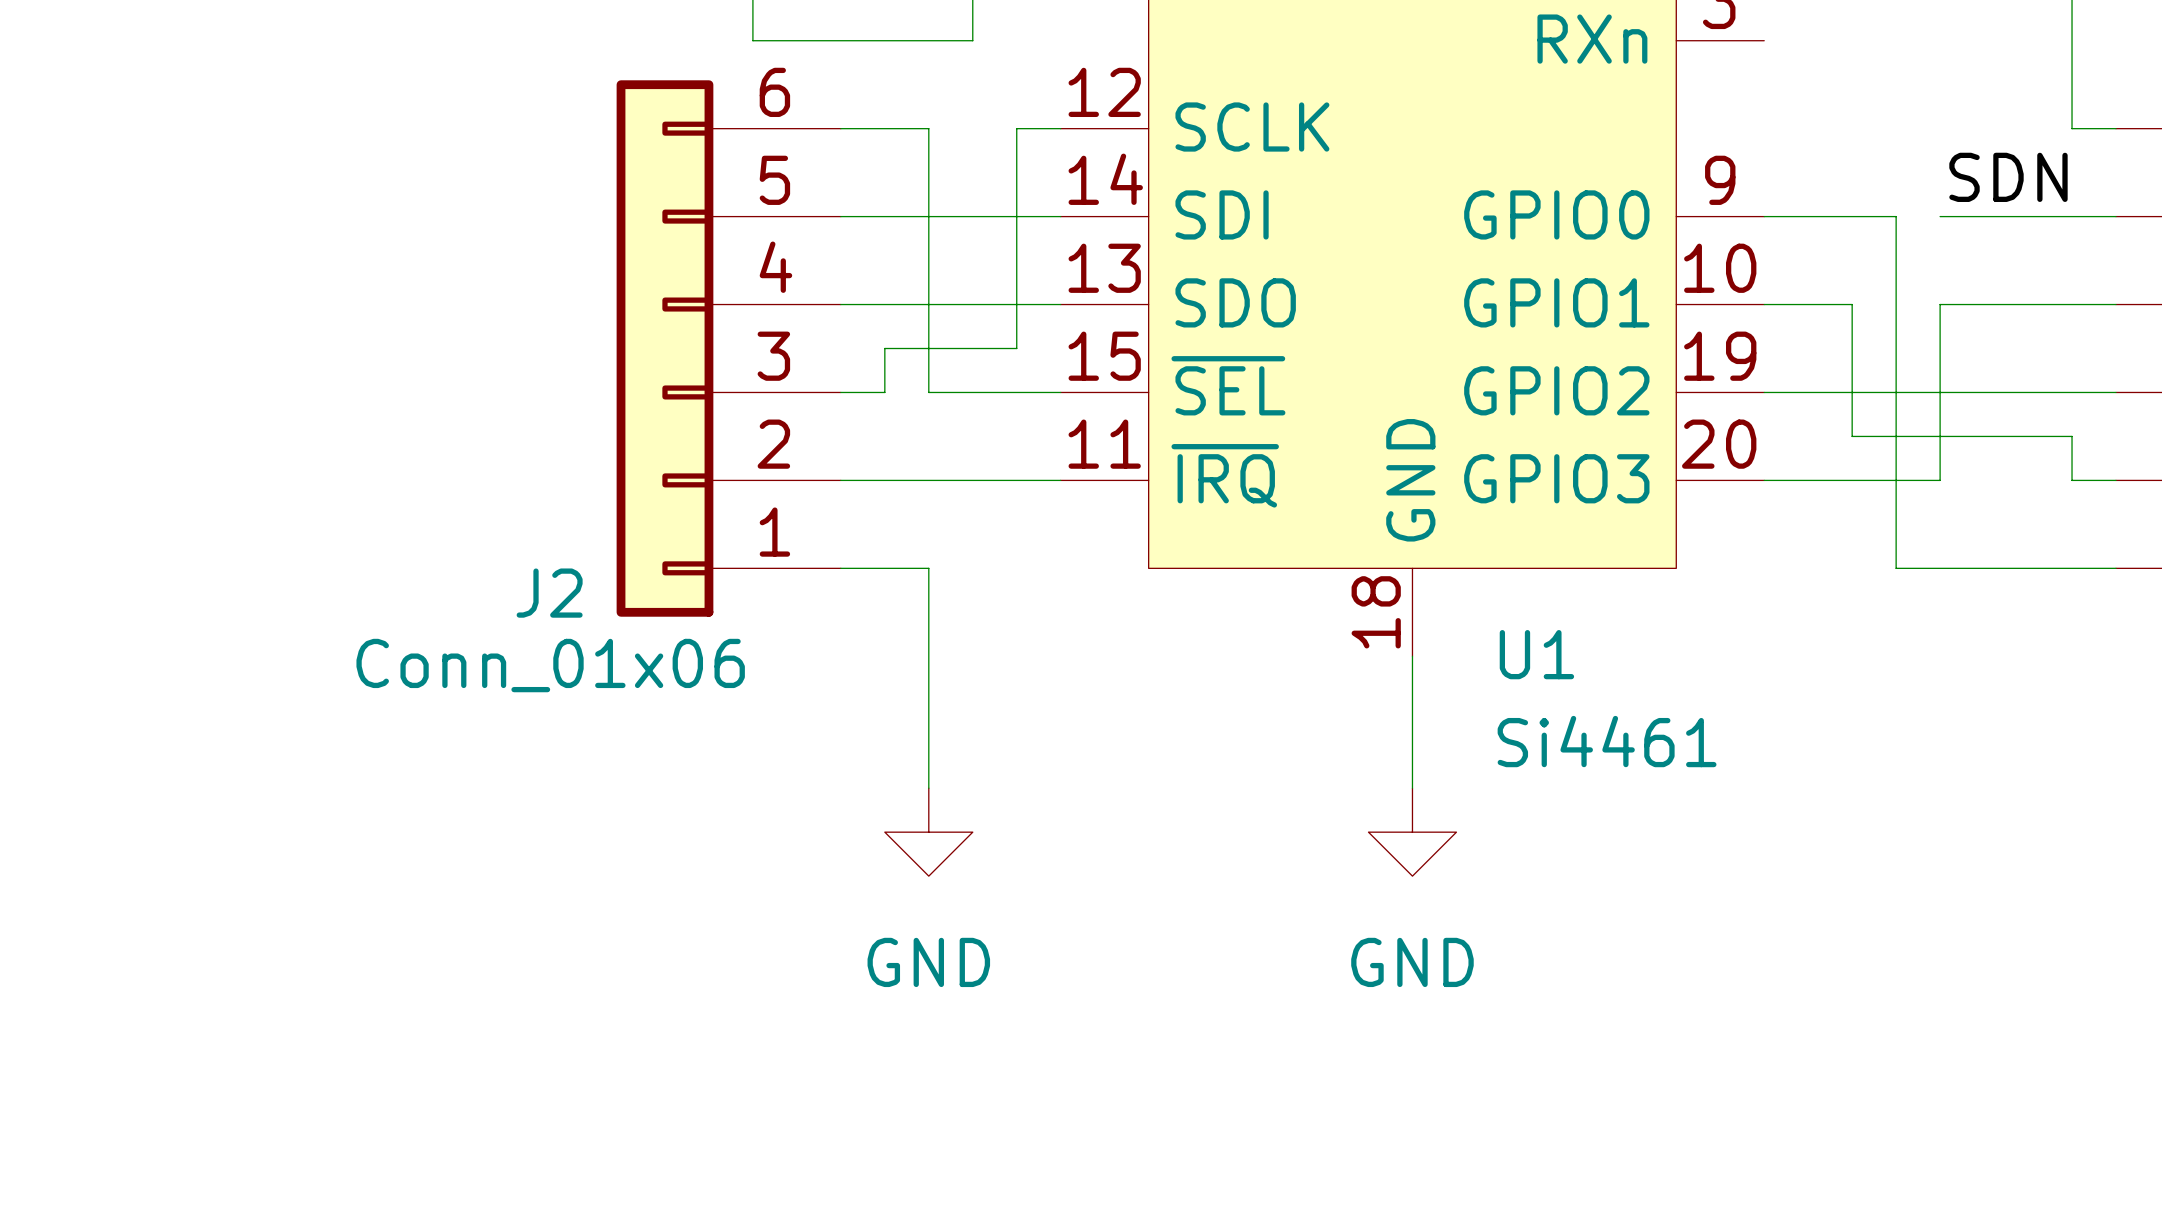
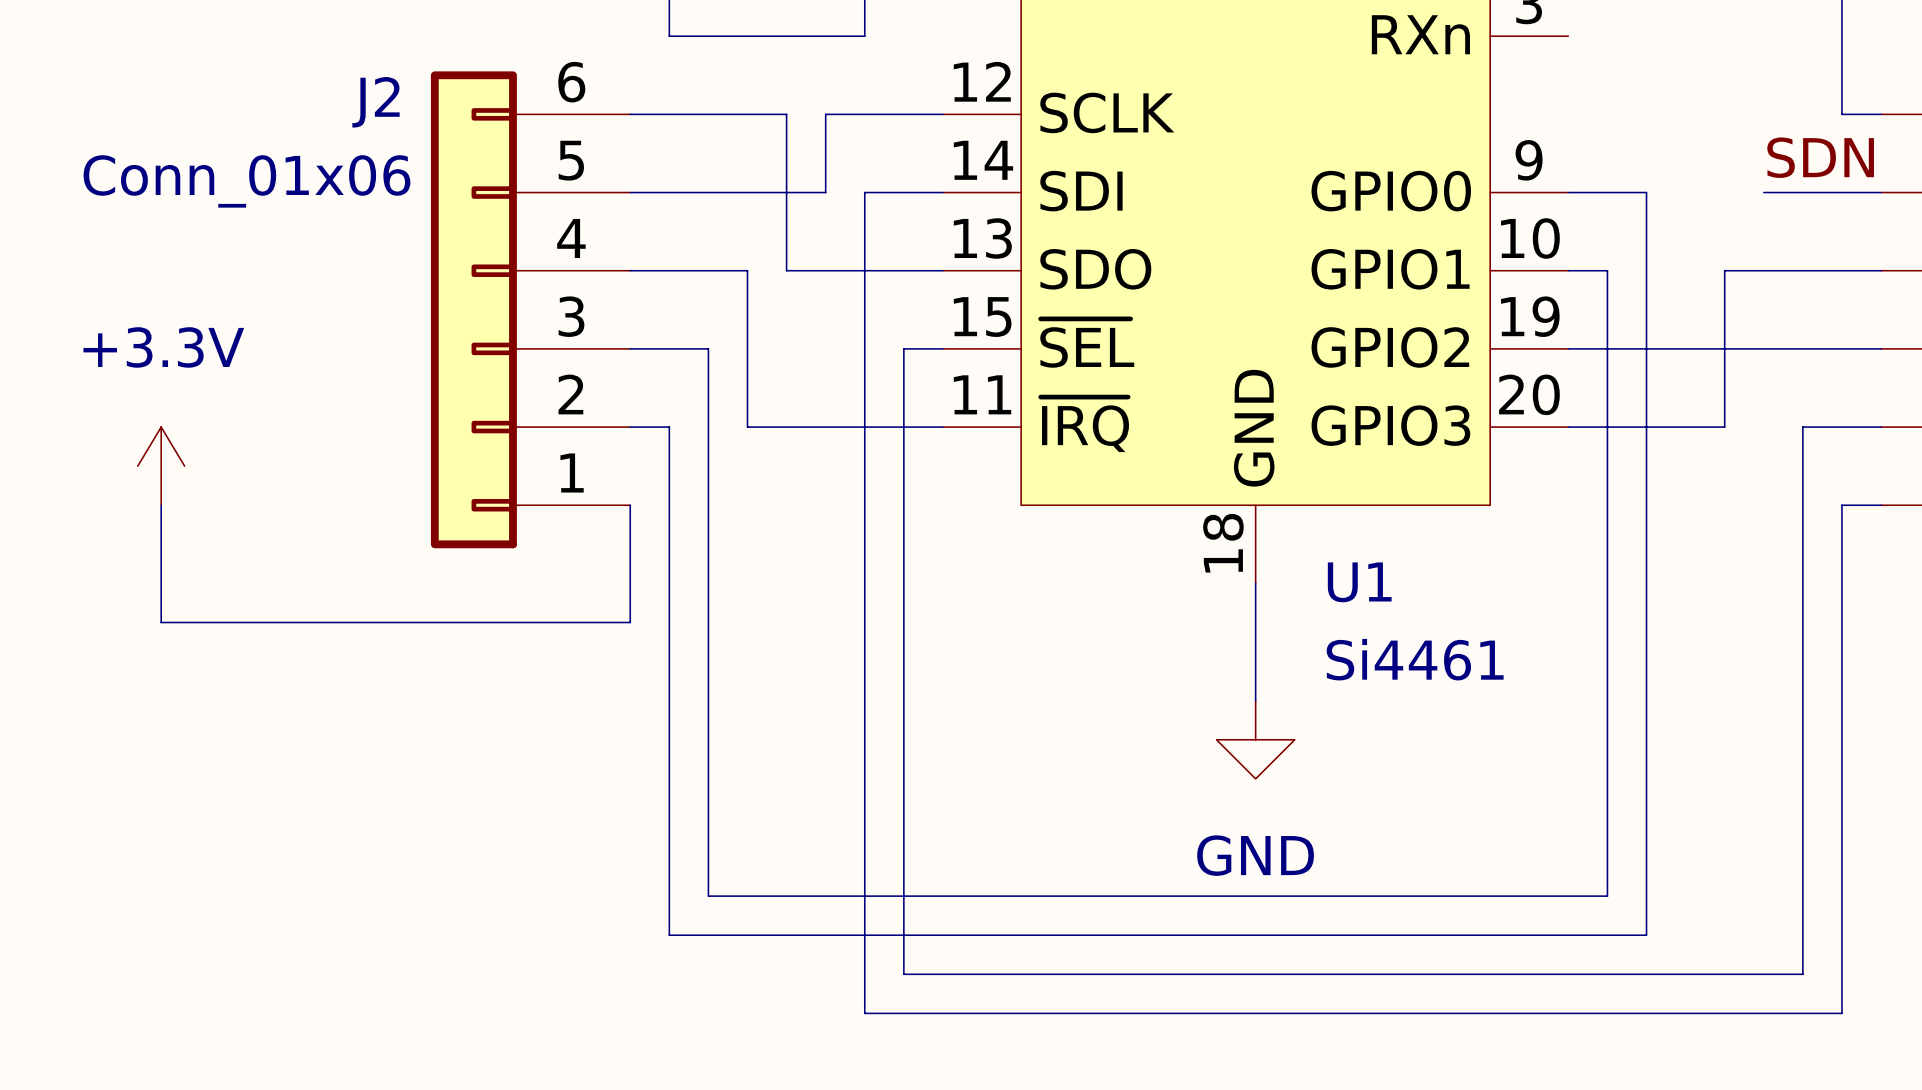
wire: (884, 128) (928, 128) -> (903, 114) (825, 114)
wire: (1016, 128) (1016, 348) (884, 348) (884, 392) (840, 392) -> none
label position: SDN (2008, 177) -> SDN (1820, 157)
wire: (972, 216) (928, 216) (928, 392) (1016, 392) -> none
wire: (1852, 216) (1896, 216) (1896, 568) (2072, 568) -> (864, 192) (864, 1013) (1841, 1013) (1841, 505)
wire: (1940, 216) (1984, 216) -> none
wire: none -> (630, 270) (747, 270) (747, 427)
wire: (840, 304) (884, 304) -> (786, 114) (786, 270)
wire: (1808, 304) (1852, 304) -> (1646, 192) (1646, 270)
wire: none -> (1607, 270) (1607, 896) (708, 896) (708, 348) (630, 348)
J2 position: (728, 348) -> (530, 309)
wire: (1852, 436) (2072, 436) (2072, 480) -> (903, 348) (903, 974) (1802, 974) (1802, 427) (1841, 427)
wire: none -> (1646, 387) (1646, 935) (669, 935) (669, 427) (630, 427)
power symbol: none -> +3.3V (161, 466)
wire: none -> (161, 505) (161, 622) (630, 622) (630, 505)
wire: (840, 568) (928, 568) (928, 788) -> none
J2 name position: J2 (549, 593) -> J2 (376, 102)
J2 value position: Conn_01x06 (550, 665) -> Conn_01x06 (247, 181)
power symbol: GND (928, 832) -> none

